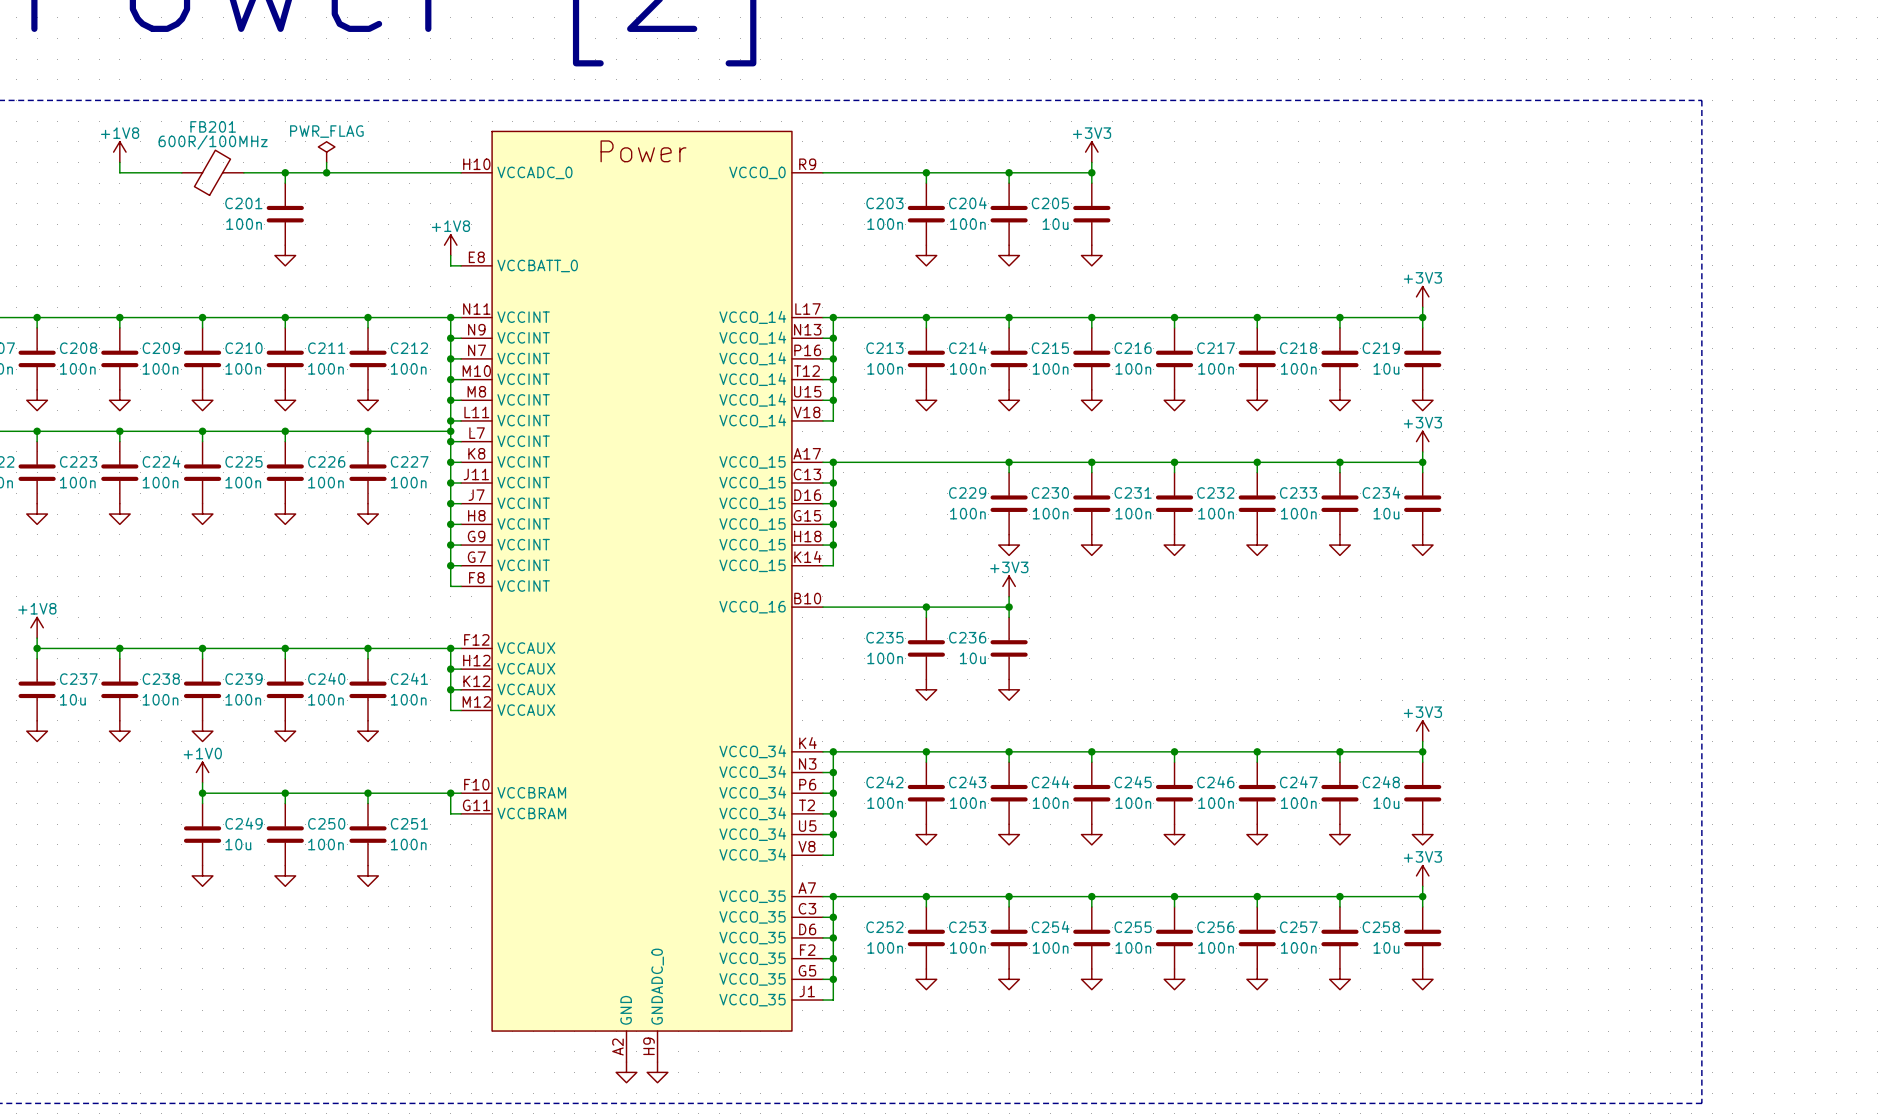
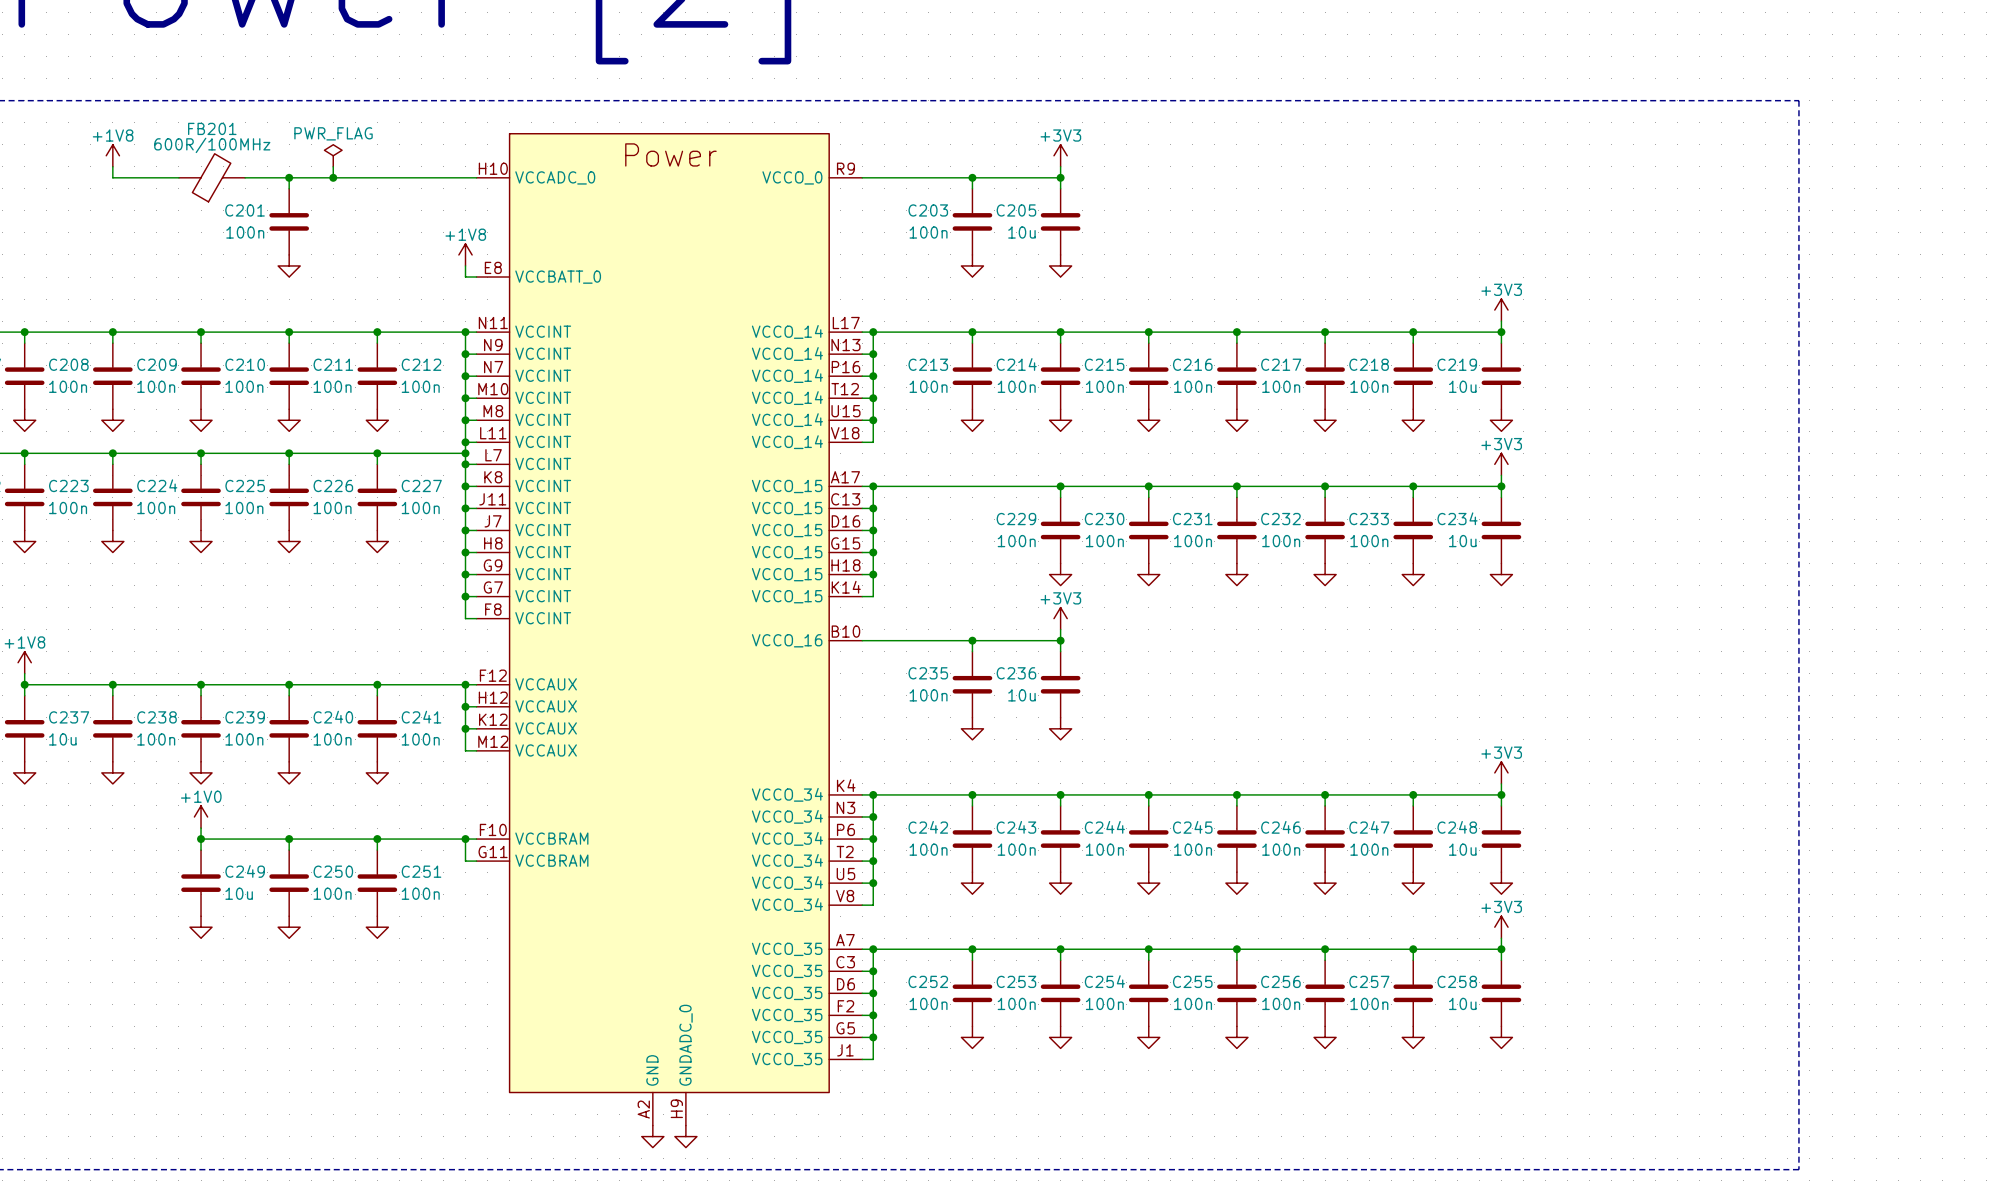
power symbol position: +3V3 (1091, 152) -> +3V3 (1060, 155)
wire: (1091, 162) (1091, 183) -> none
wire: (1009, 172) (1091, 172) -> (1060, 177) (1060, 166)
junction: (1091, 172) -> none
C204 name: C204 (967, 203) -> C205 (1016, 210)
C205: 10u (1091, 214) -> none
C204 value: 100n (967, 224) -> 10u (1021, 232)
power symbol: (1091, 255) -> none

